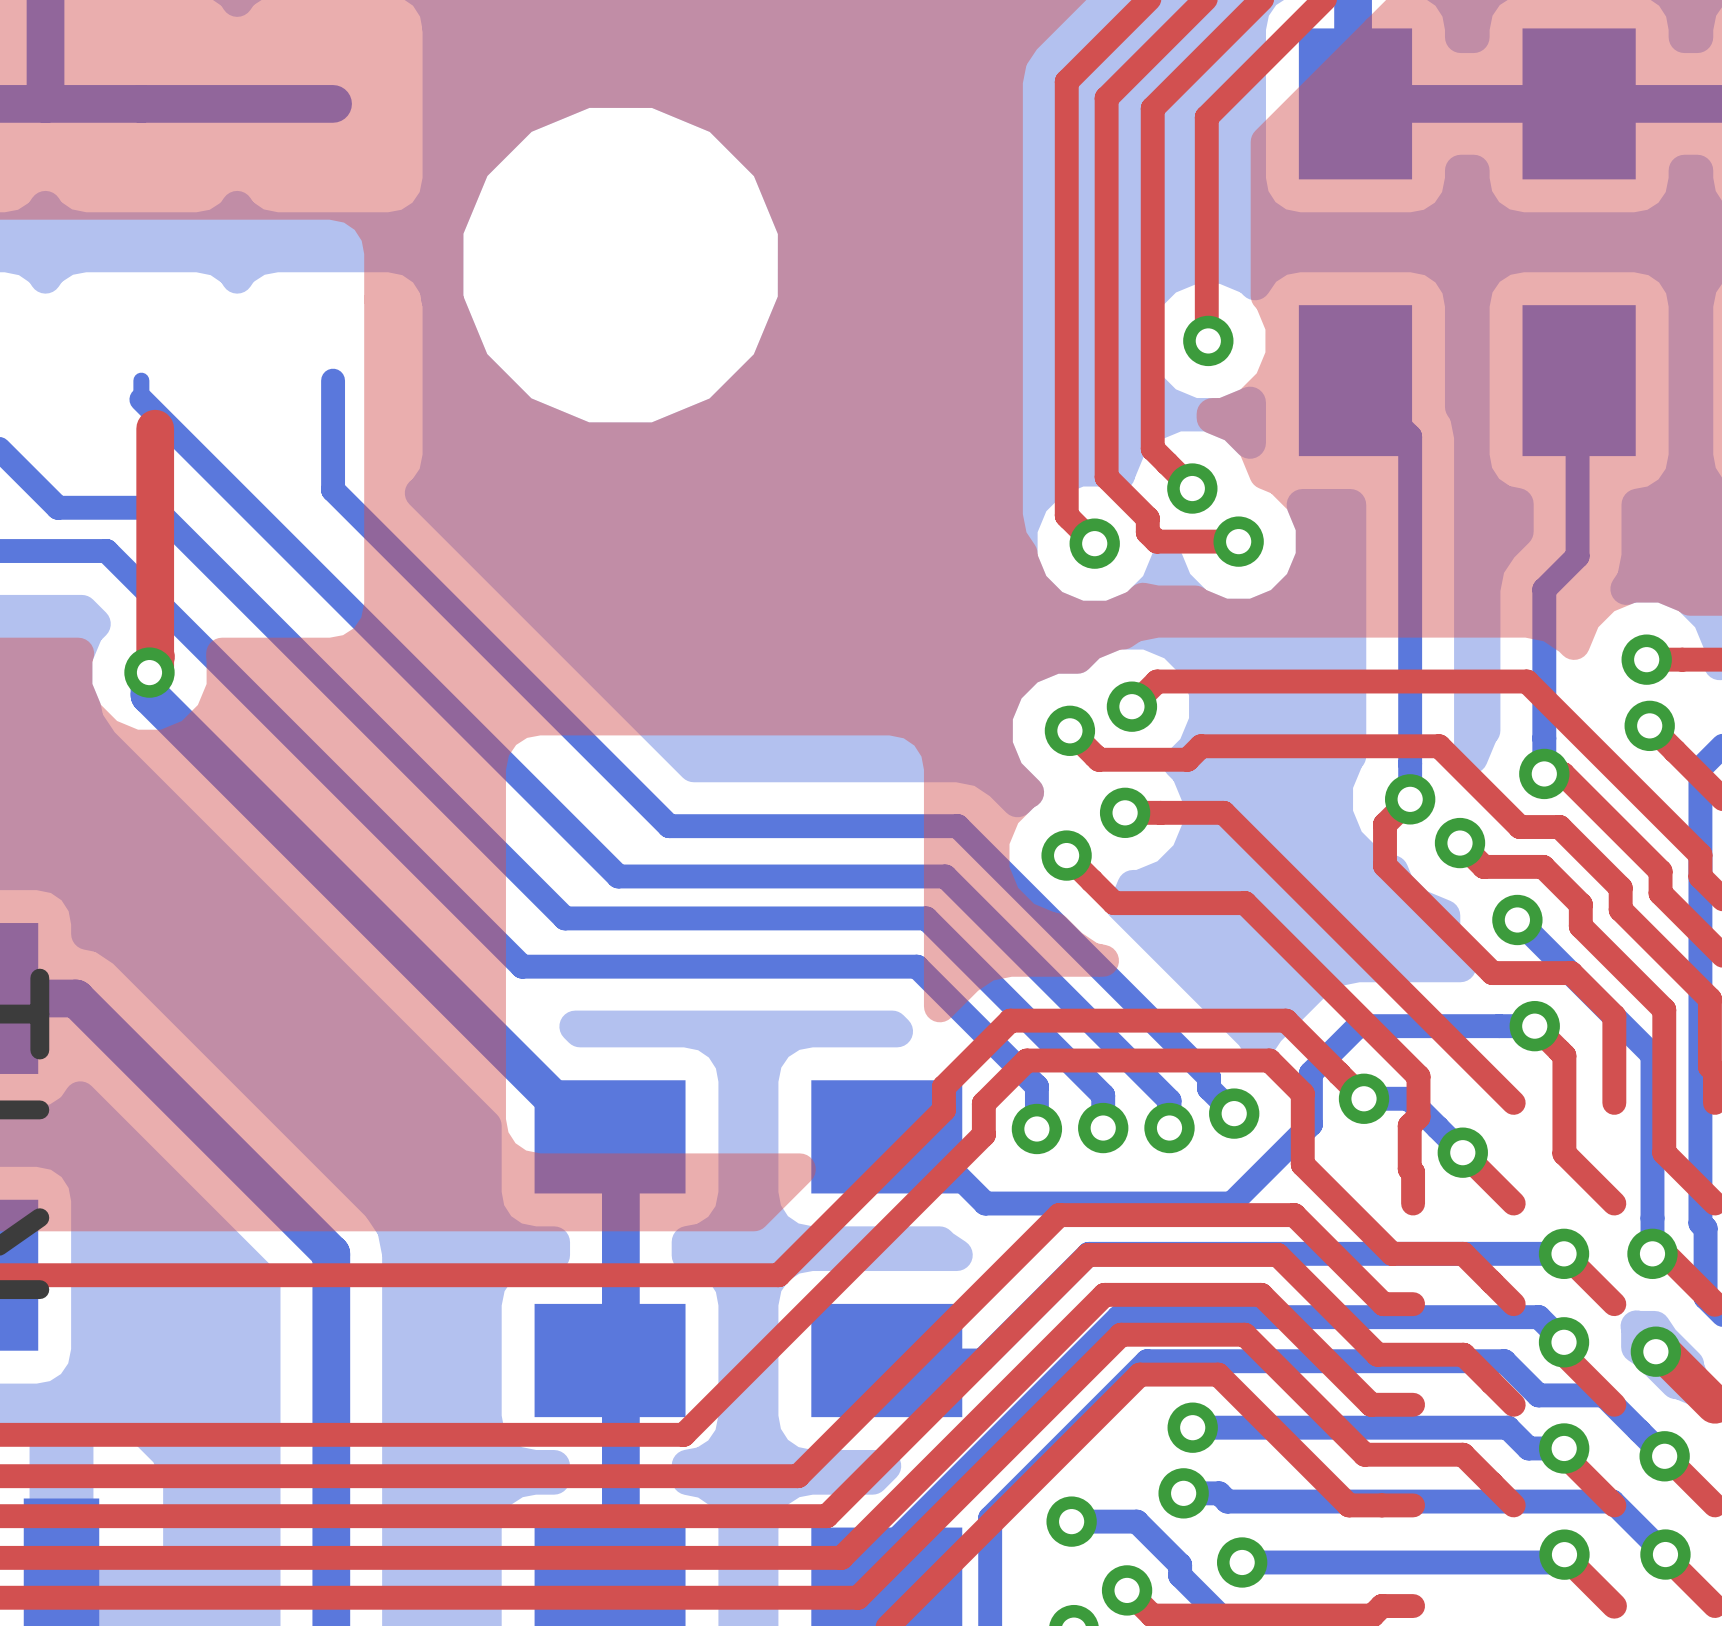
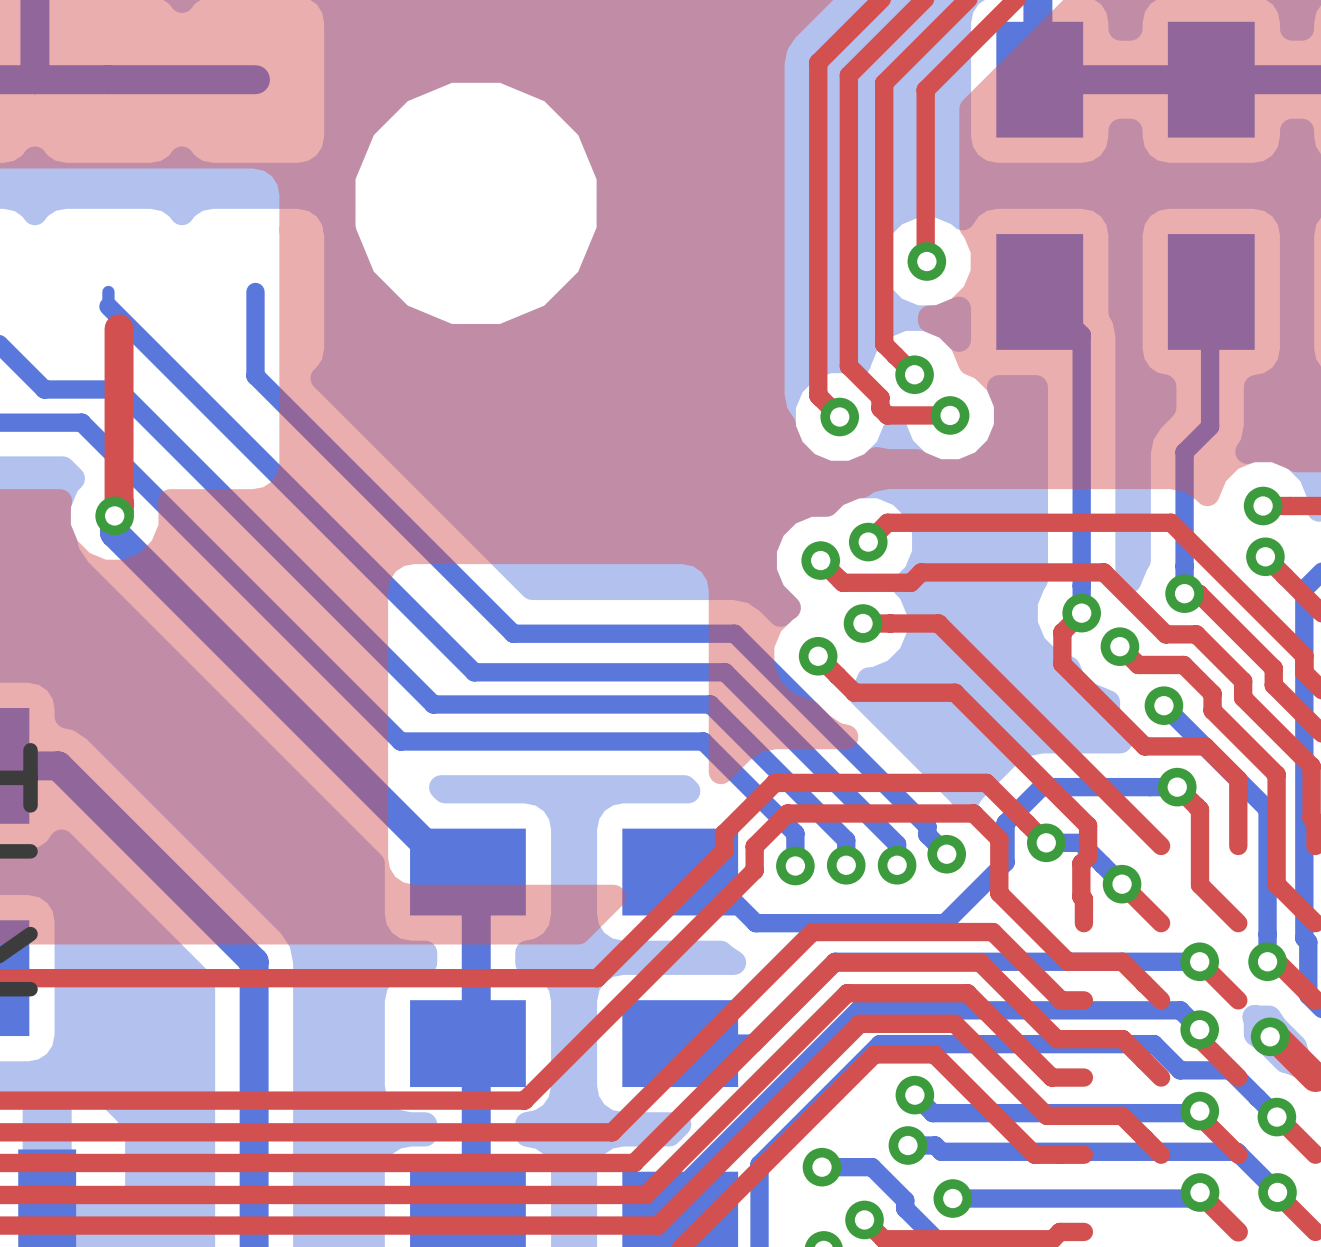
bottom track: (1192, 1427) (1507, 1427) (1528, 1448) (1564, 1448) -> (914, 1095) (932, 1113) (1199, 1113)

